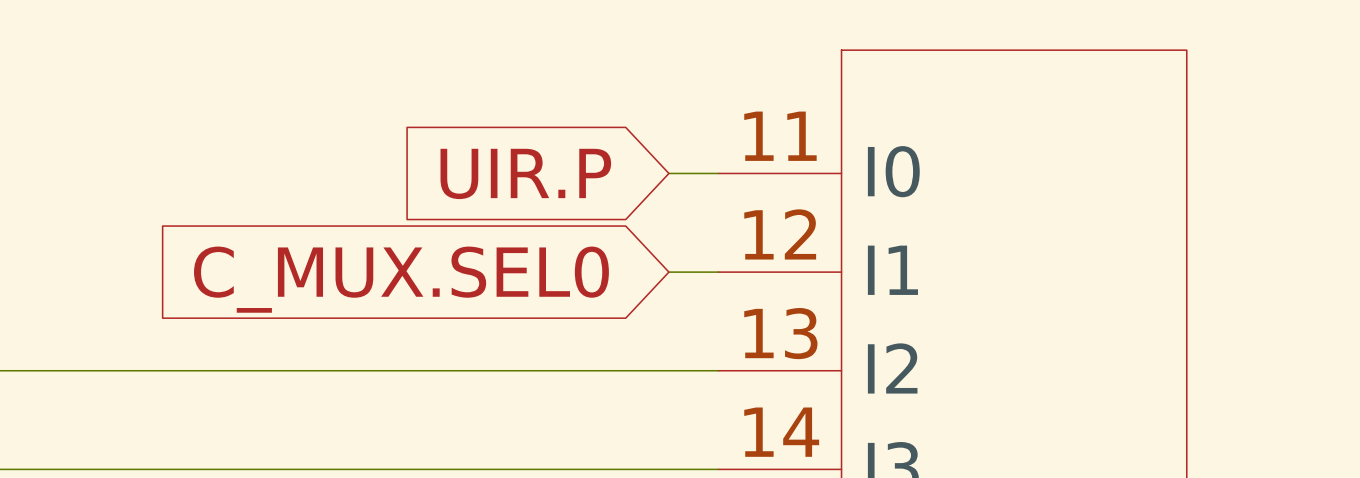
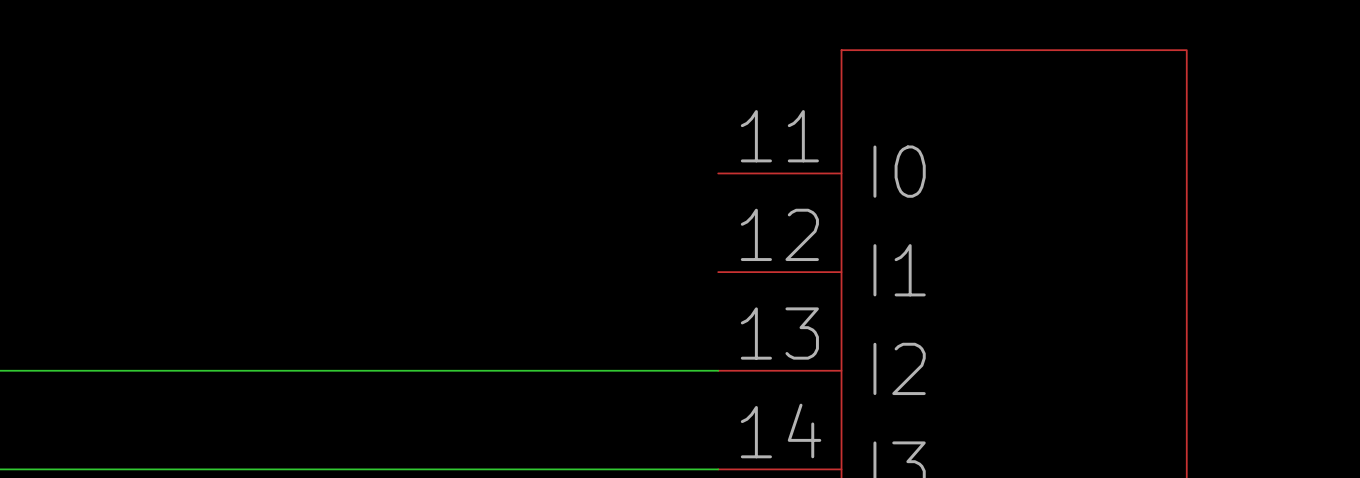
global label: UIR.P (525, 173) -> none
wire: (668, 173) (718, 173) -> none
wire: (668, 272) (718, 272) -> none
global label: C_MUX.SEL0 (401, 279) -> none

